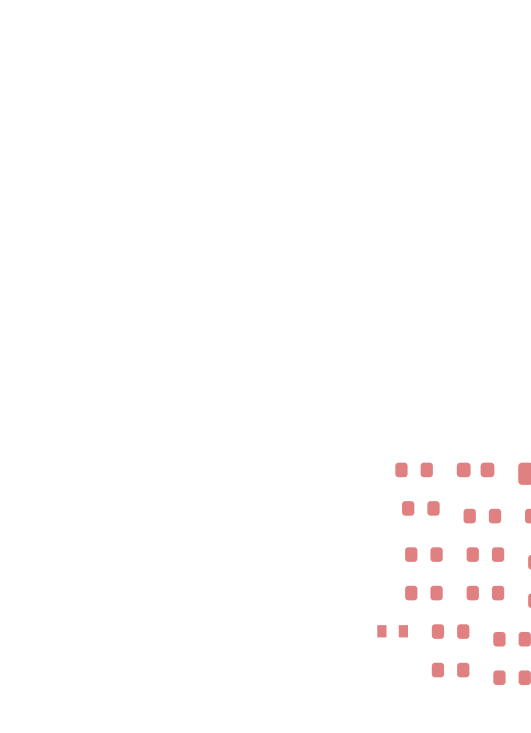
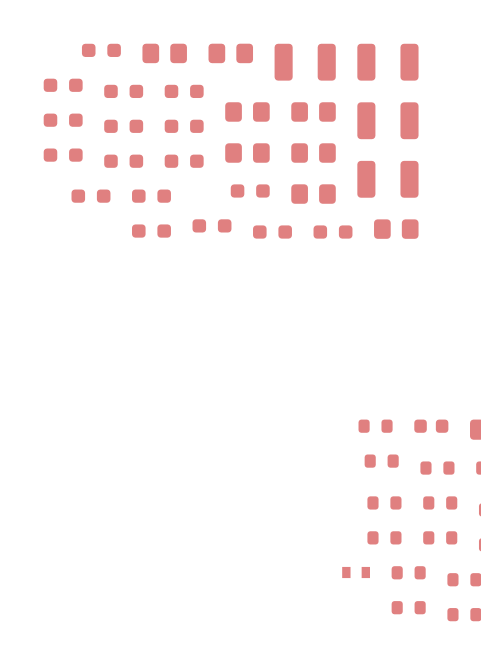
part: none -> (101, 50)
part: none -> (164, 53)
part: none -> (230, 53)
part: none -> (305, 62)
part: none -> (387, 62)
part: none -> (63, 85)
part: none -> (123, 91)
part: none -> (184, 91)
part: none -> (247, 111)
part: none -> (313, 111)
part: none -> (63, 120)
part: none -> (387, 120)
part: none -> (123, 126)
part: none -> (184, 126)
part: none -> (247, 153)
part: none -> (313, 153)
part: none -> (63, 155)
part: none -> (123, 161)
part: none -> (184, 161)
part: none -> (387, 179)
part: none -> (250, 190)
part: none -> (313, 194)
part: none -> (90, 196)
part: none -> (151, 196)
part: none -> (211, 225)
part: none -> (396, 229)
part: none -> (151, 231)
part: none -> (272, 232)
part: none -> (332, 232)

